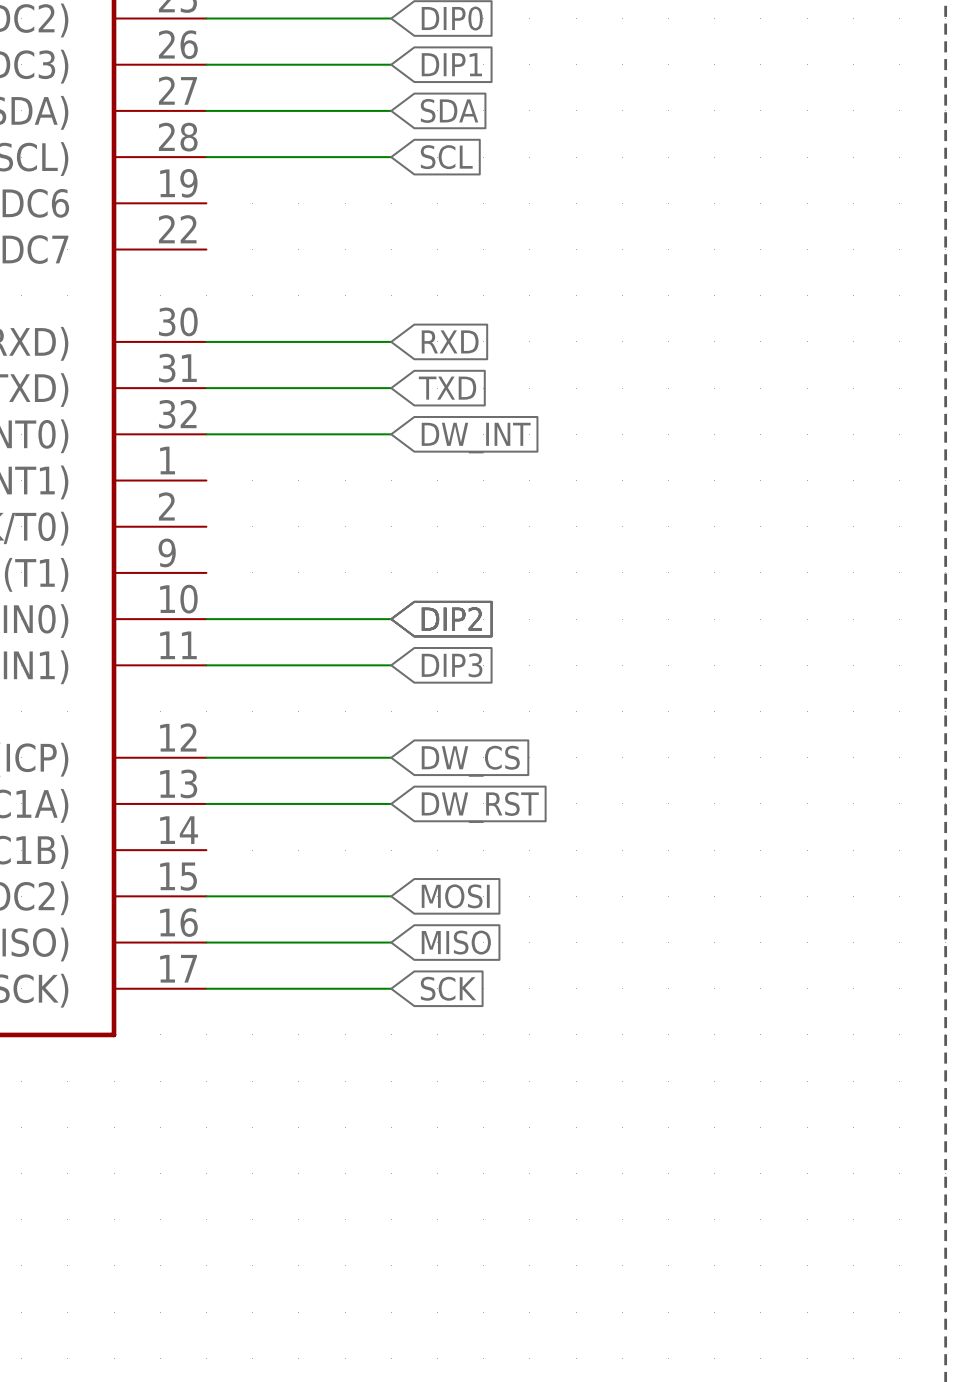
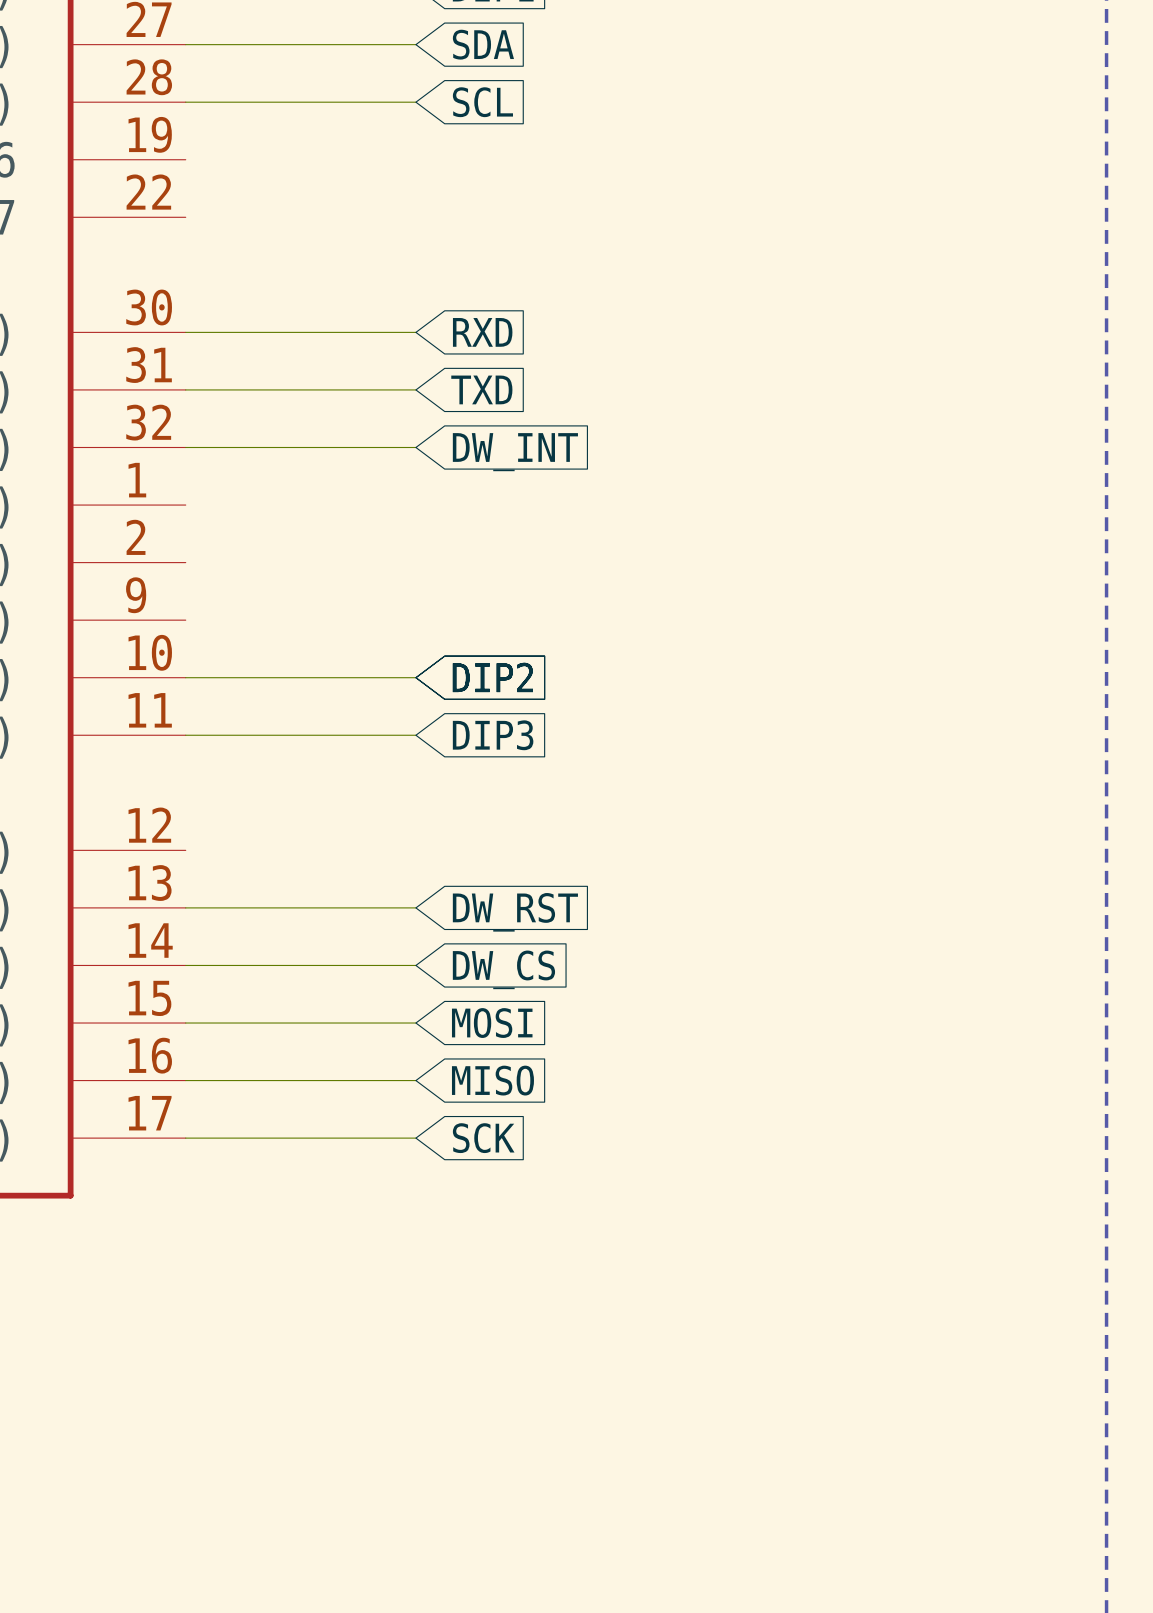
wire: (206, 757) (391, 757) -> (185, 965) (415, 965)
global label position: DW_CS (470, 761) -> DW_CS (503, 969)

